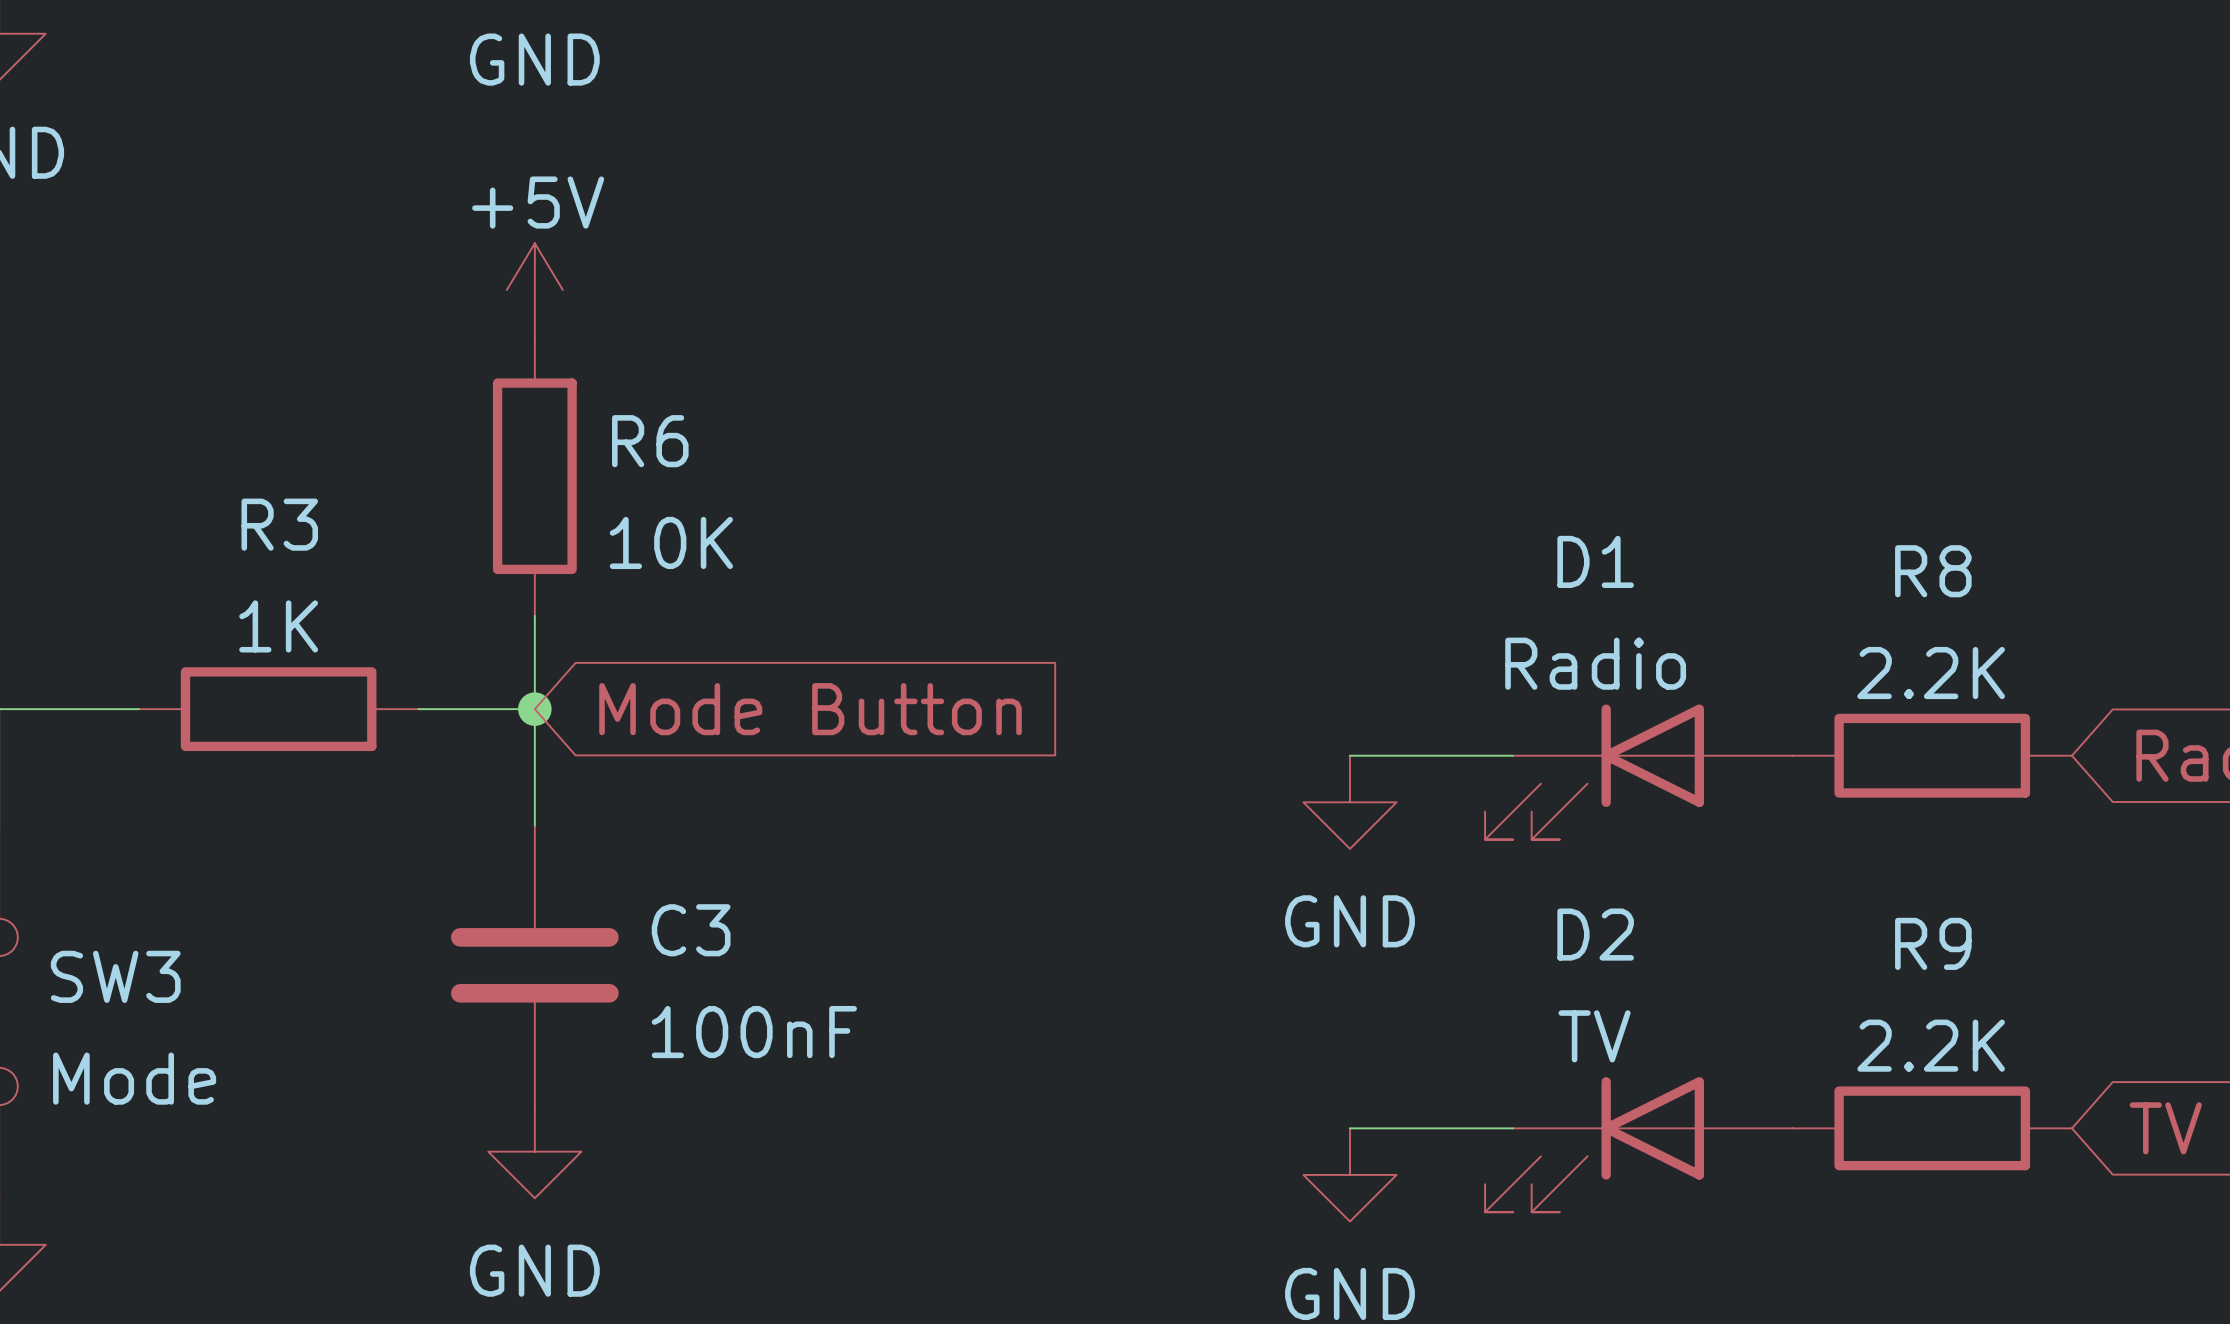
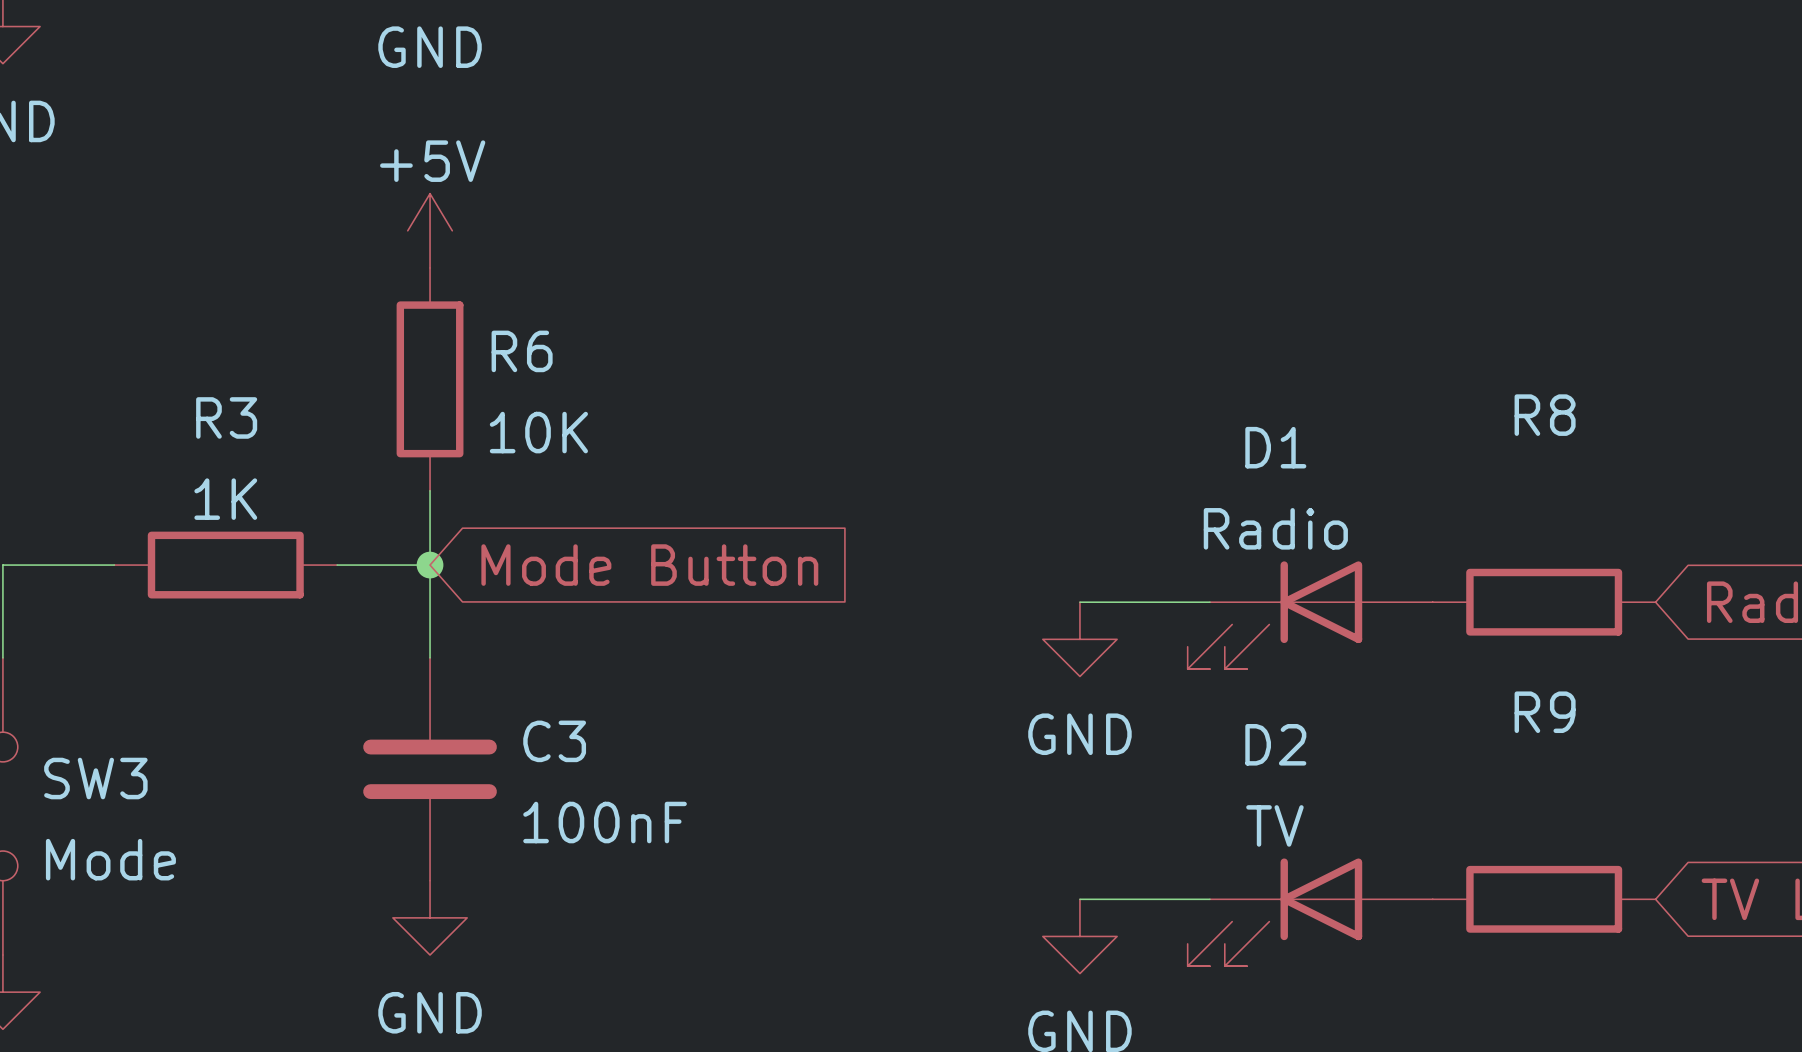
R8 name position: R8 (1933, 571) -> R8 (1545, 415)
R8 value: 2.2K (1931, 673) -> none
R9 name position: R9 (1933, 943) -> R9 (1545, 712)
R9 value: 2.2K (1931, 1045) -> none

